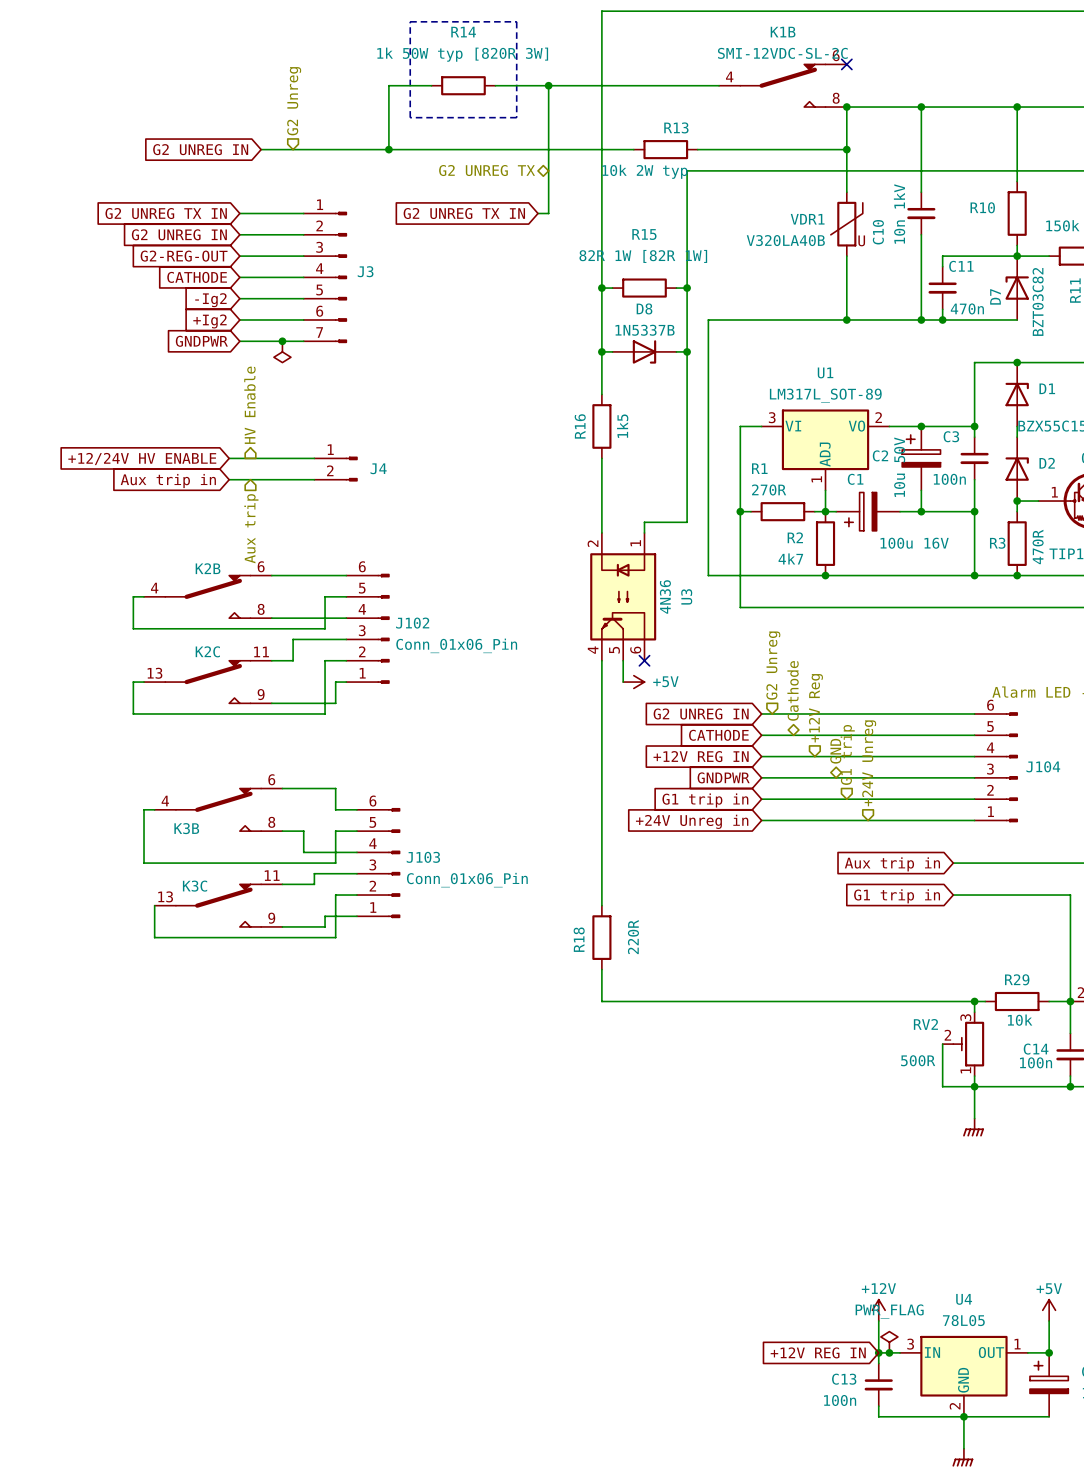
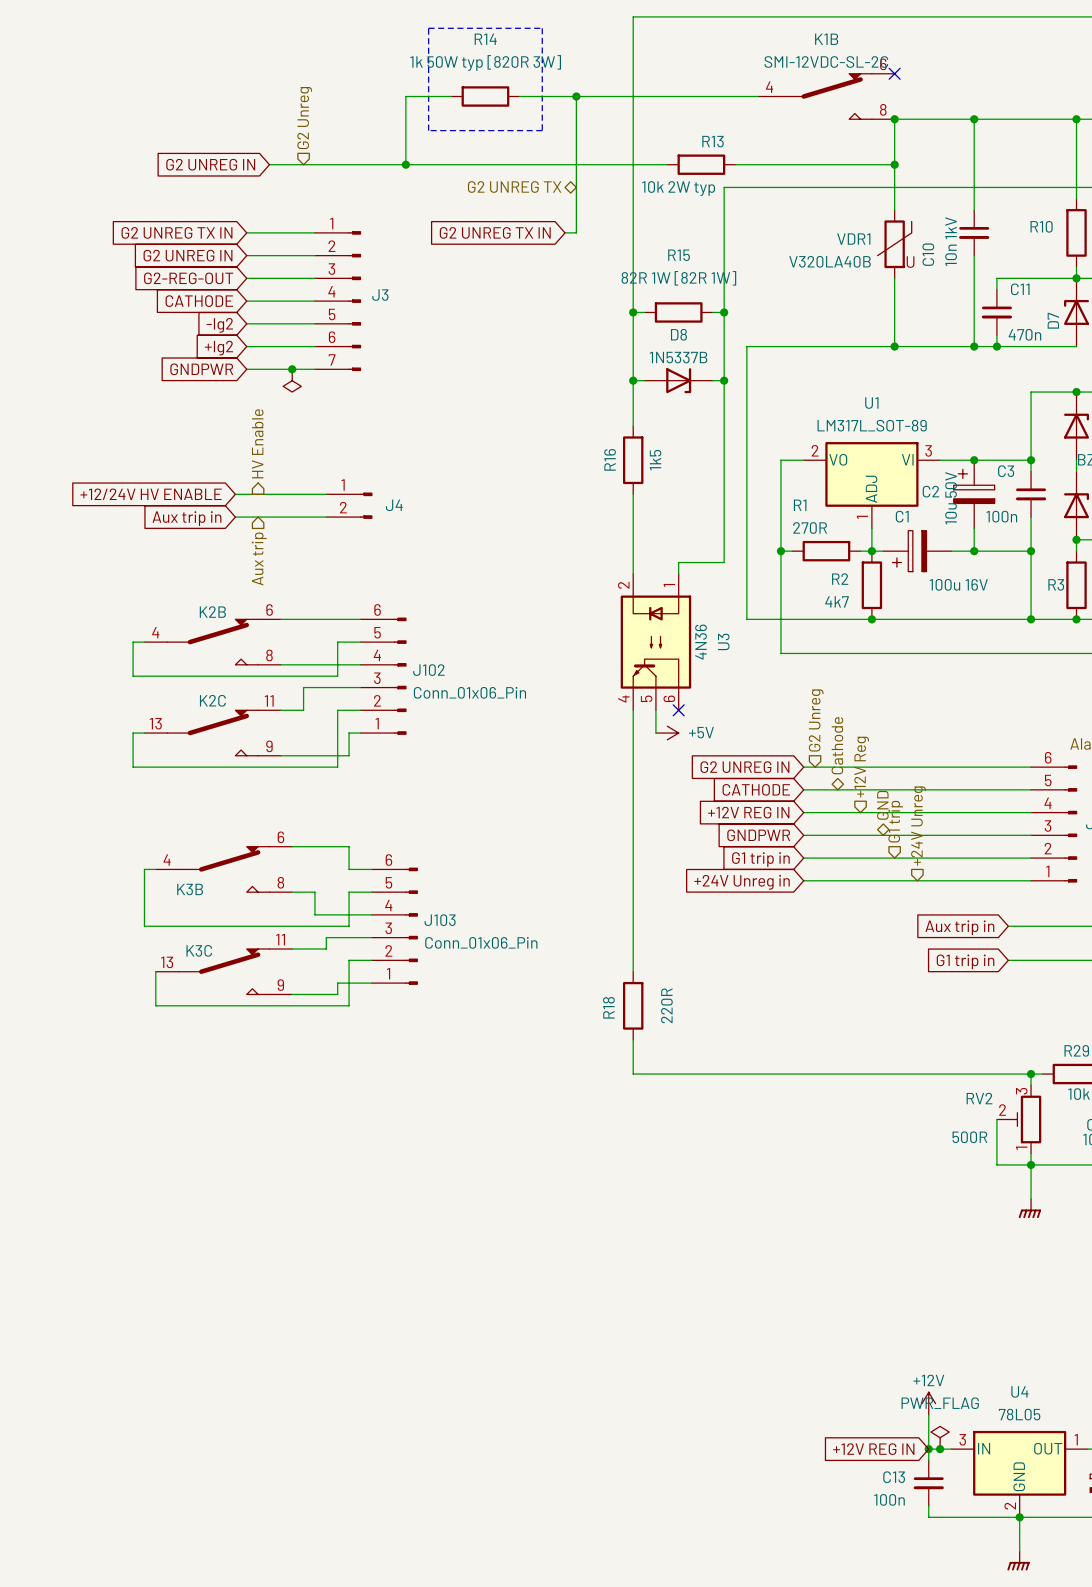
U1 flip: as is (825, 439) -> left-right (871, 474)

